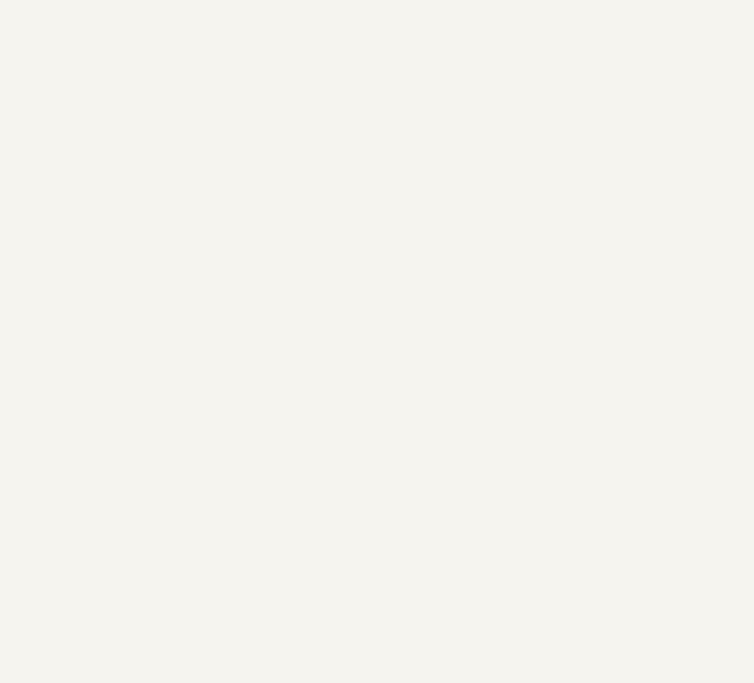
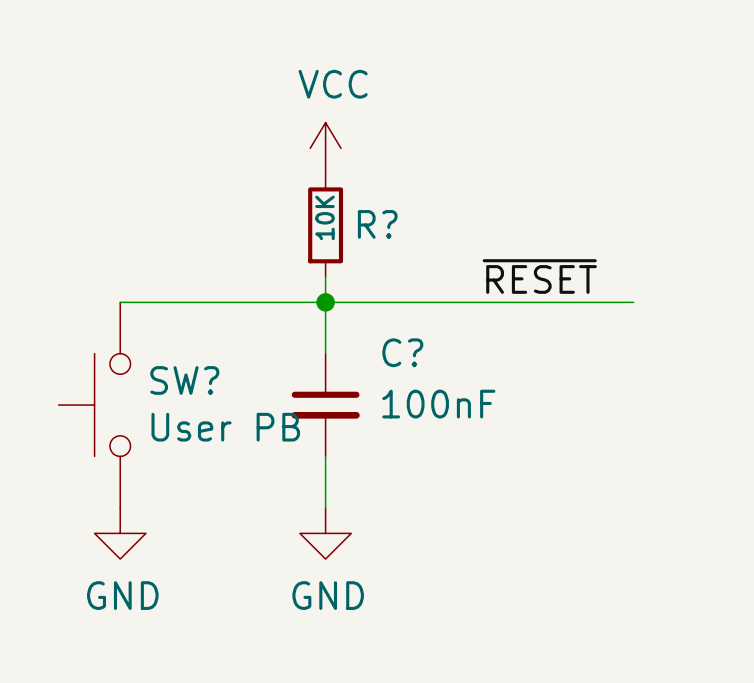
power symbol: none -> VCC (325, 148)
R?: none -> 10K (325, 225)
wire: none -> (325, 276) (325, 353)
label: none -> ~{RESET} (539, 276)
wire: none -> (120, 302) (633, 302)
junction: none -> (325, 302)
SW?: none -> User PB (94, 405)
C?: none -> 100nF (325, 405)
wire: none -> (325, 456) (325, 507)
power symbol: none -> GND (120, 533)
power symbol: none -> GND (325, 533)

